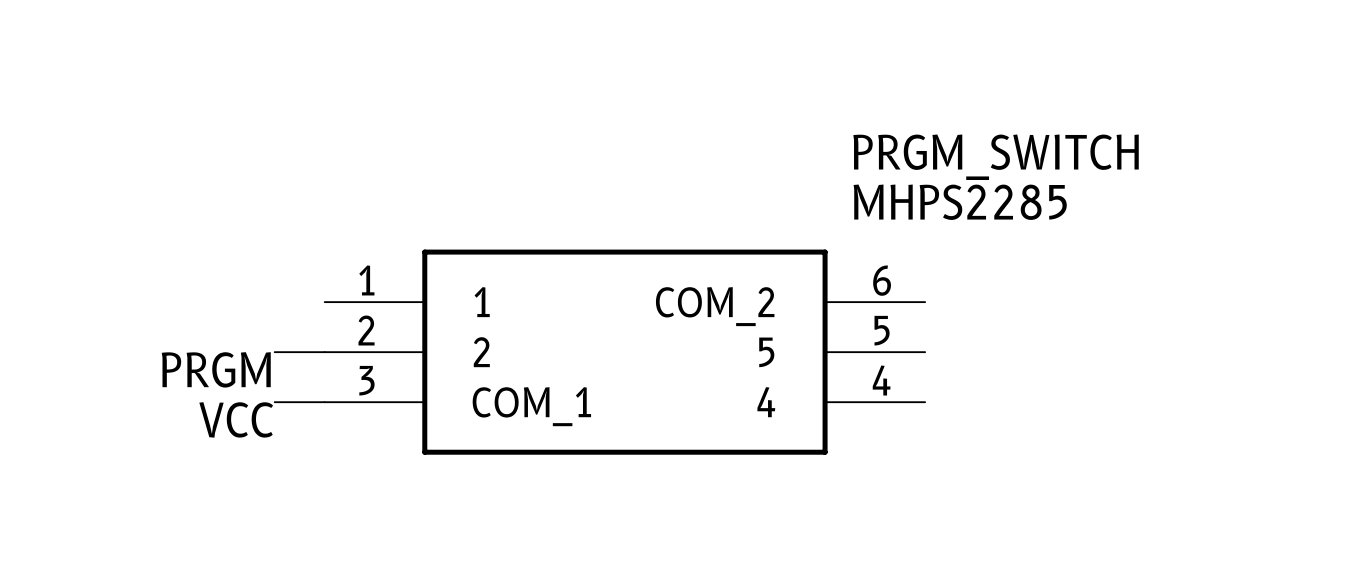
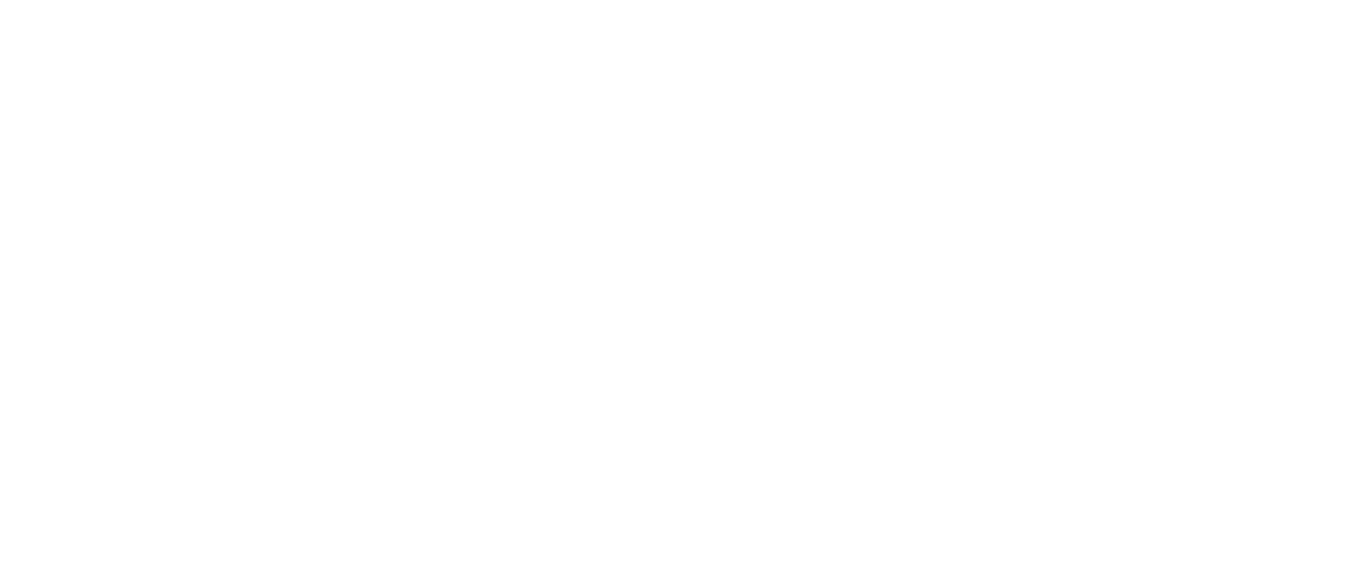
wire: (274, 352) (324, 352) -> none
PRGM_SWITCH: MHPS2285 (624, 352) -> none
label: PRGM (216, 369) -> none
wire: (274, 402) (324, 402) -> none
label: VCC (236, 419) -> none

